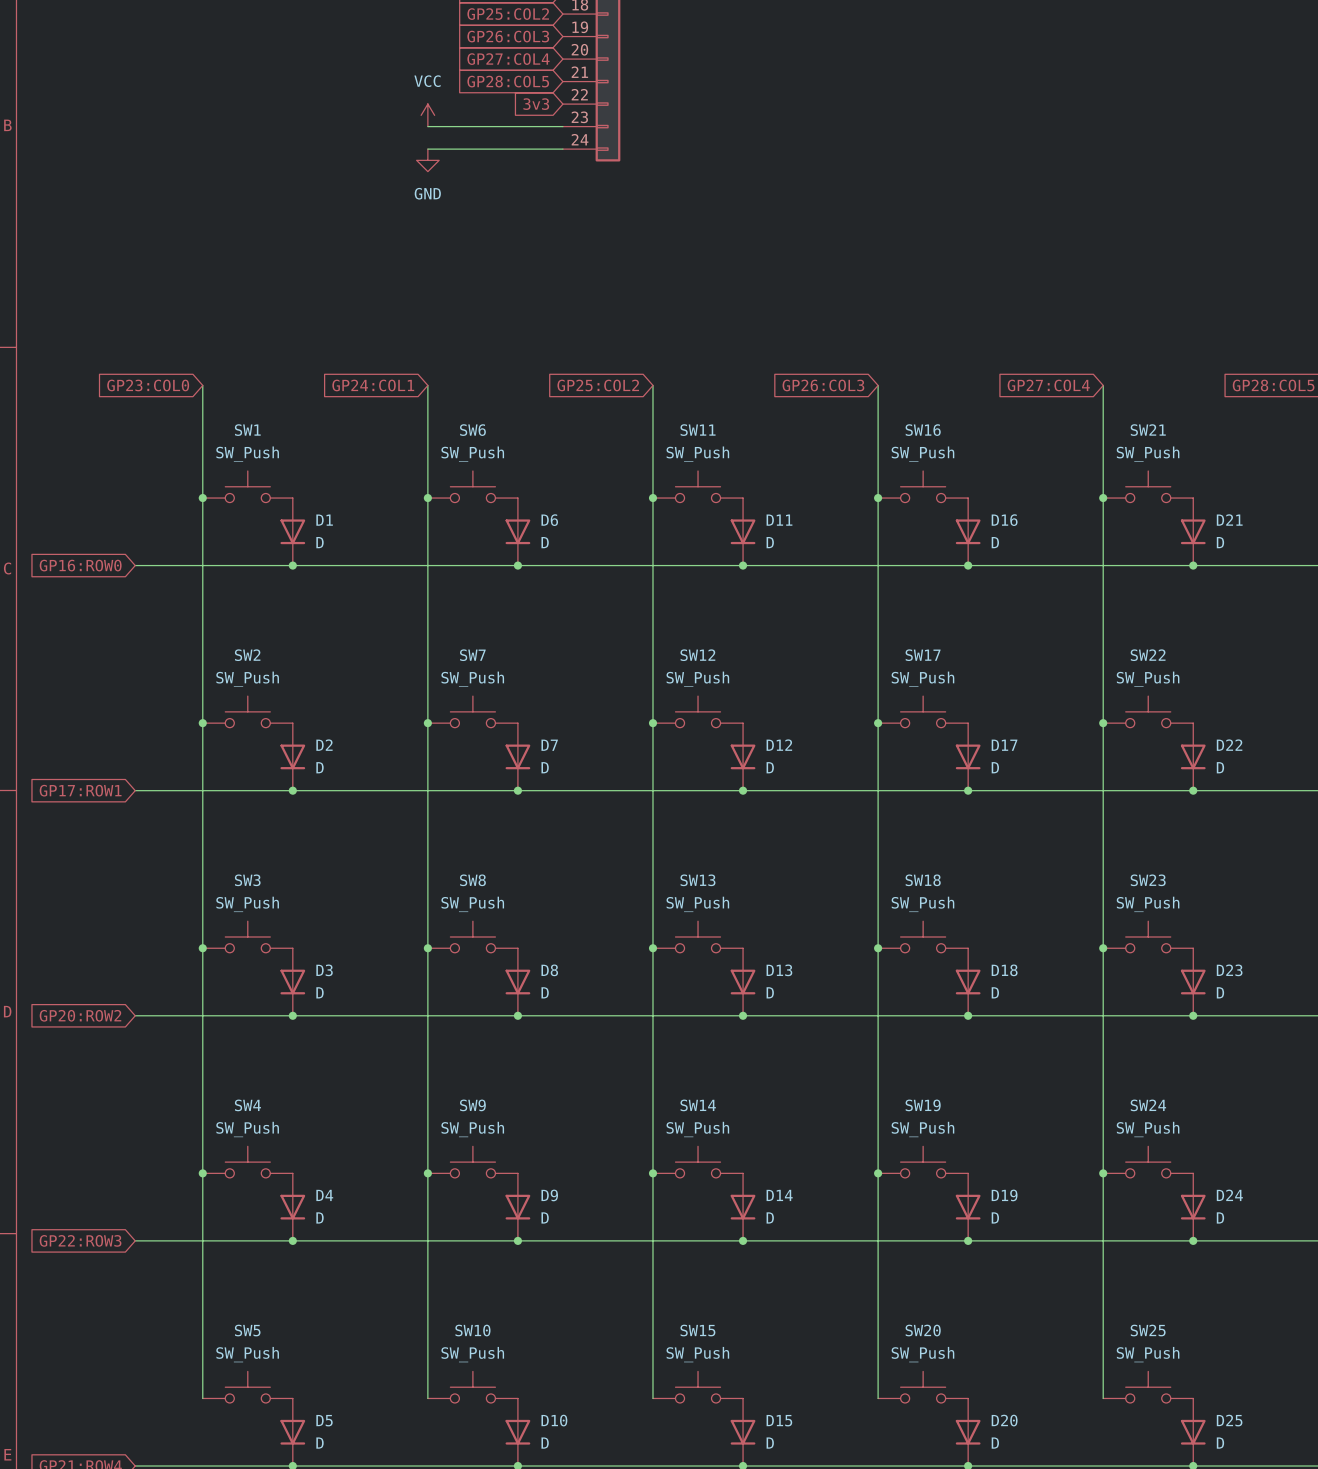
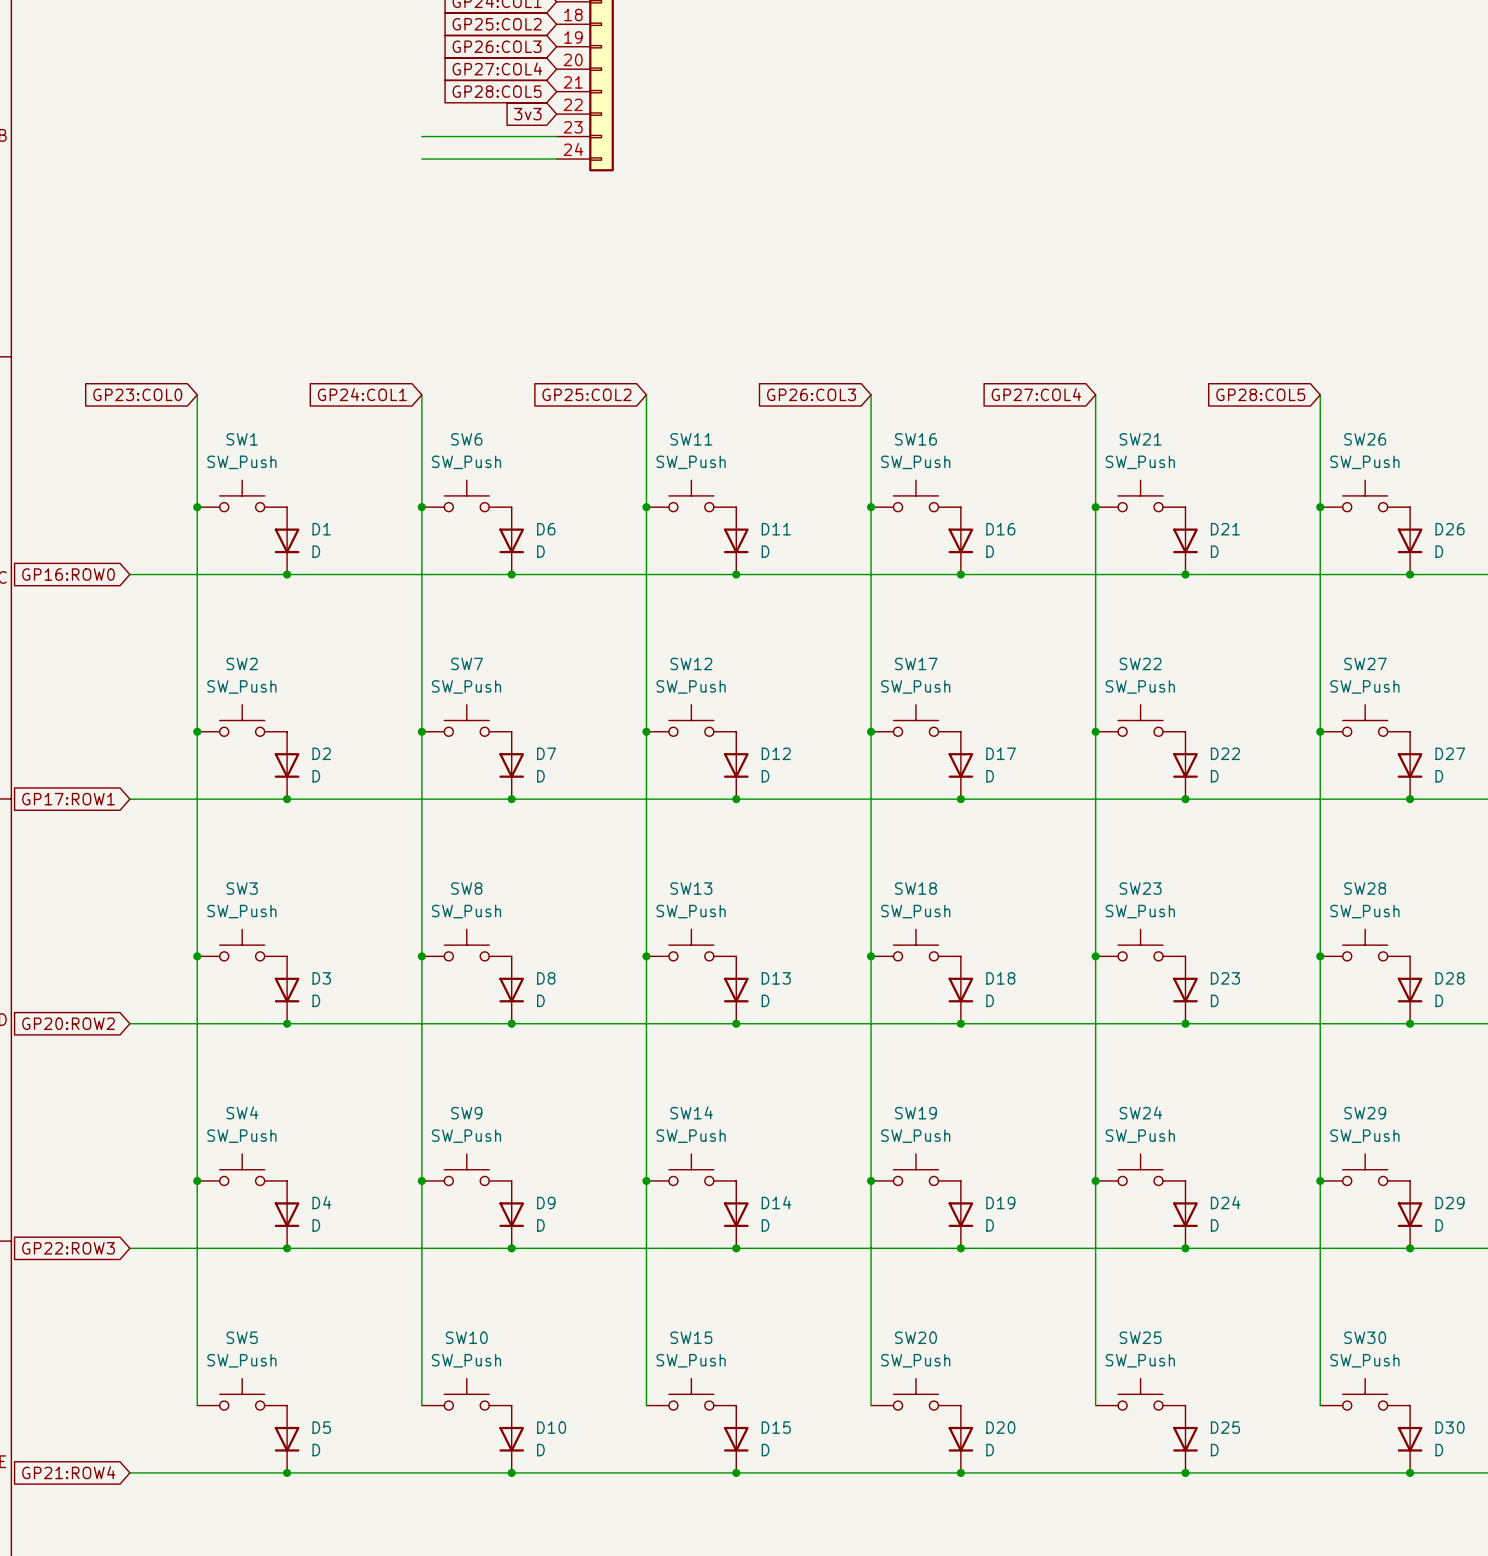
power symbol: VCC (427, 115) -> none
power symbol: GND (427, 160) -> none

